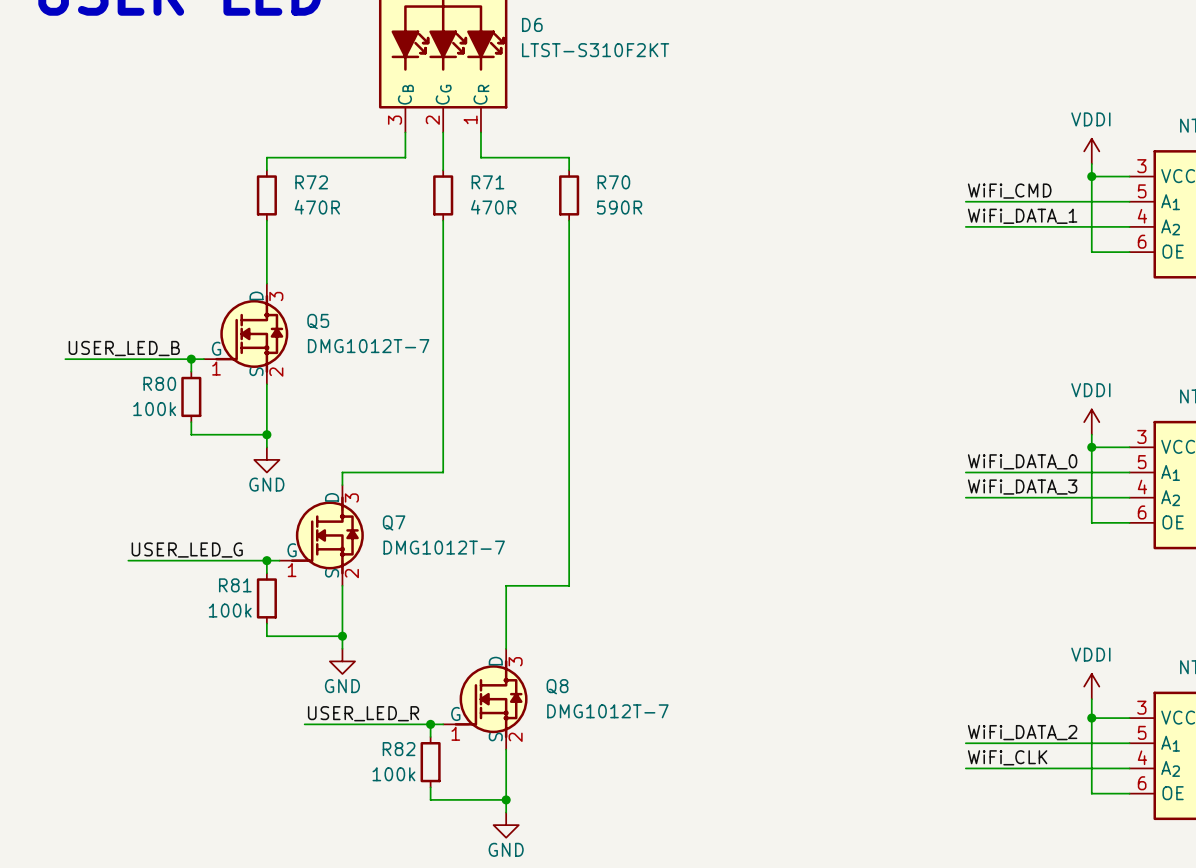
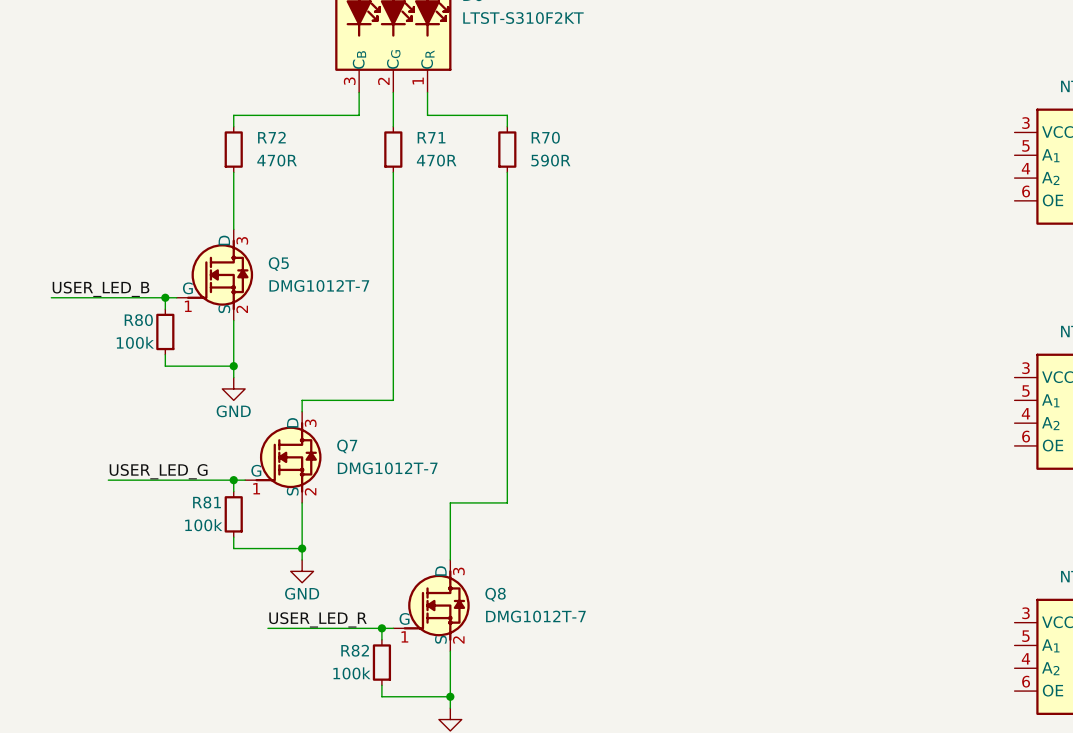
power symbol: VDDI (1091, 151) -> none
wire: (1091, 163) (1091, 252) (1129, 252) -> none
wire: (1091, 176) (1129, 176) -> none
junction: (1091, 176) -> none
label: WiFi_CMD (1009, 191) -> none
wire: (965, 201) (1129, 201) -> none
label: WiFi_DATA_1 (1022, 216) -> none
wire: (965, 226) (1129, 226) -> none
power symbol: VDDI (1091, 422) -> none
wire: (1091, 434) (1091, 522) (1129, 522) -> none
wire: (1091, 447) (1129, 447) -> none
junction: (1091, 447) -> none
label: WiFi_DATA_0 (1022, 461) -> none
wire: (965, 472) (1129, 472) -> none
label: WiFi_DATA_3 (1022, 487) -> none
wire: (965, 497) (1129, 497) -> none
power symbol: VDDI (1091, 686) -> none
wire: (1091, 699) (1091, 793) (1129, 793) -> none
wire: (1091, 718) (1129, 718) -> none
junction: (1091, 718) -> none
label: WiFi_DATA_2 (1022, 732) -> none
wire: (965, 743) (1129, 743) -> none
label: WiFi_CLK (1007, 757) -> none
wire: (965, 768) (1129, 768) -> none

